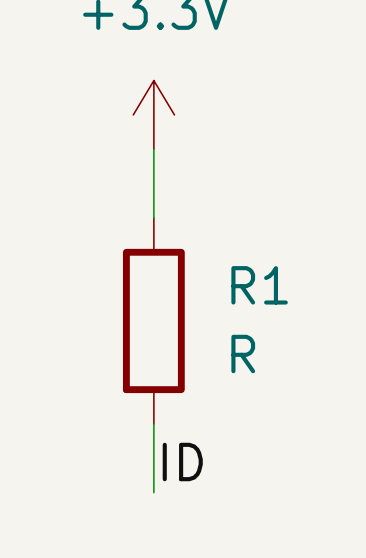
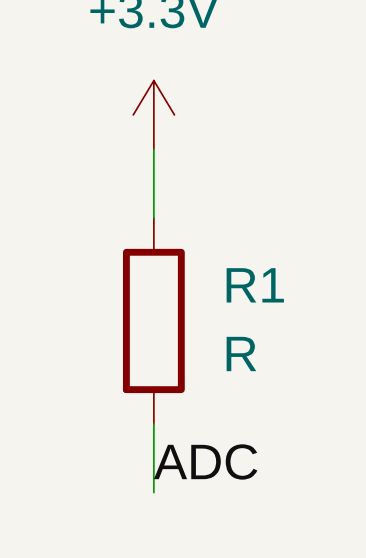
label: ID (182, 462) -> ADC (205, 461)

